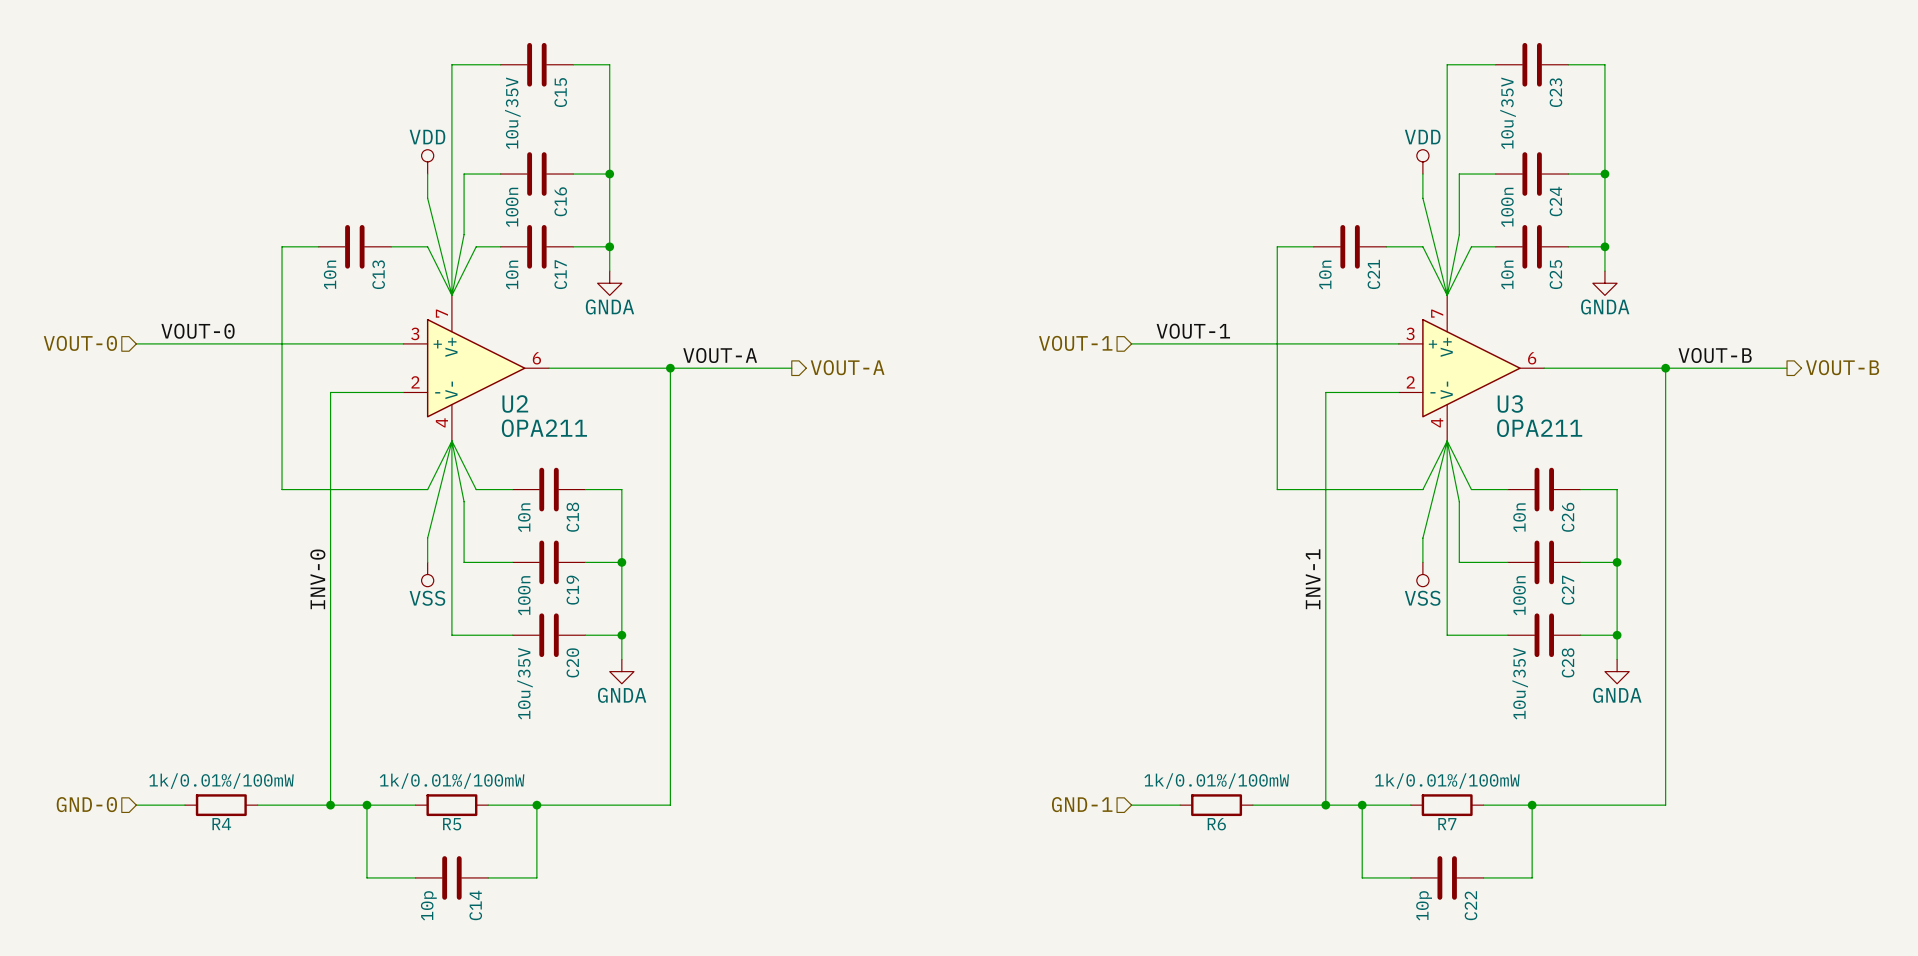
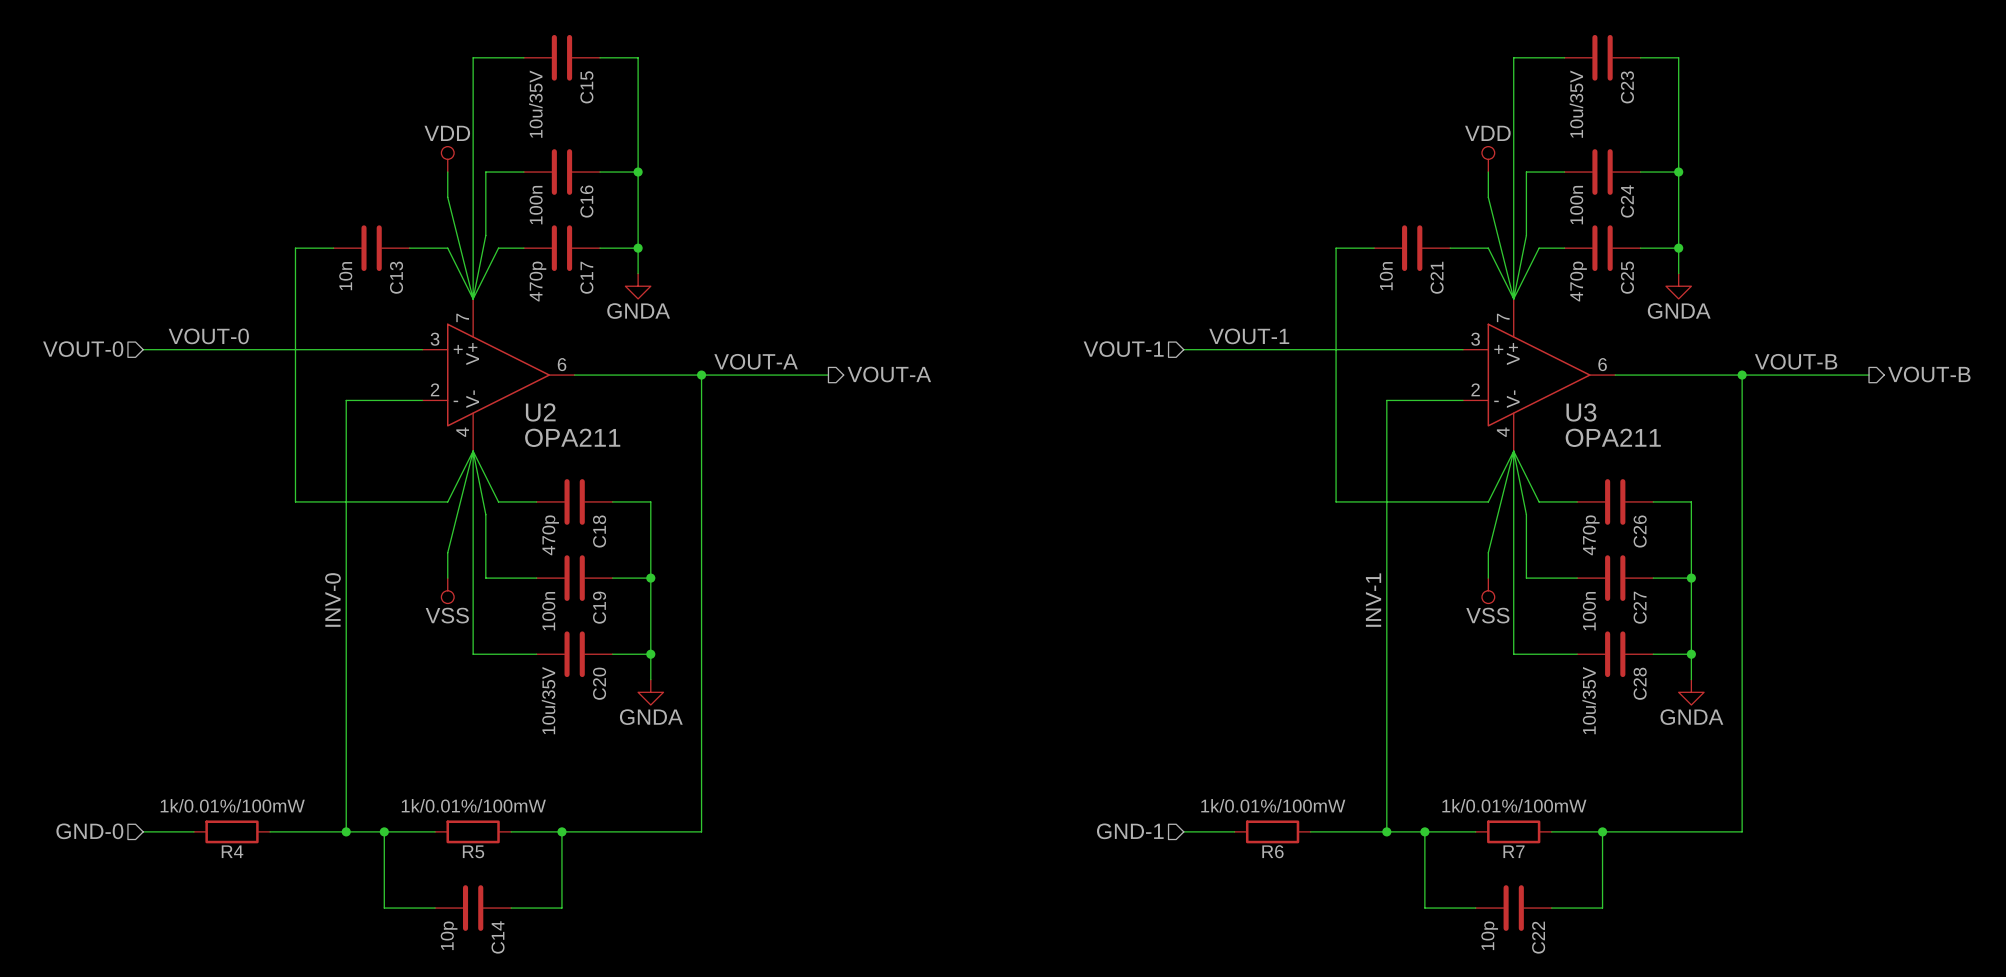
C17 value: 10n (512, 274) -> 470p (537, 281)
C25 value: 10n (1507, 274) -> 470p (1578, 281)
C18 value: 10n (524, 517) -> 470p (550, 535)
C26 value: 10n (1519, 517) -> 470p (1591, 535)

